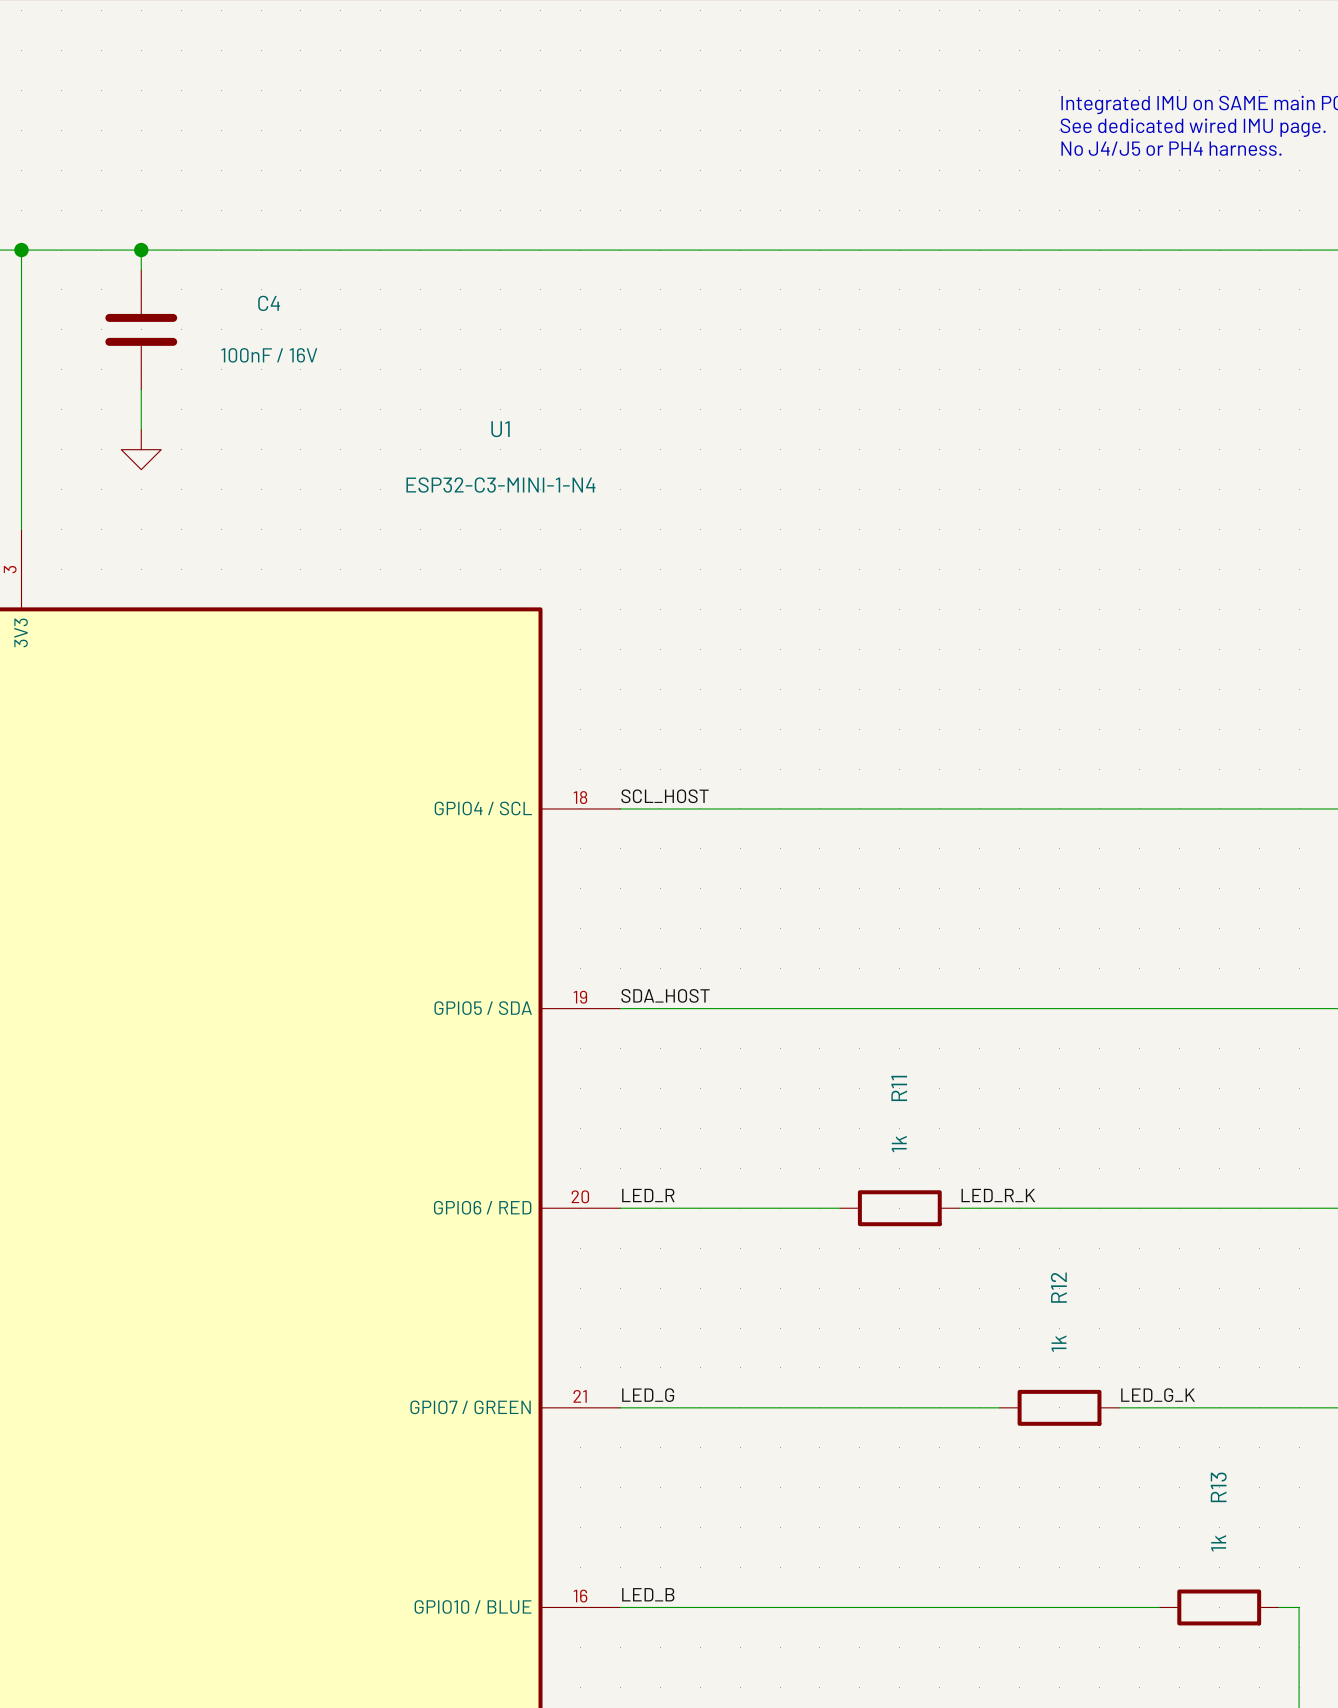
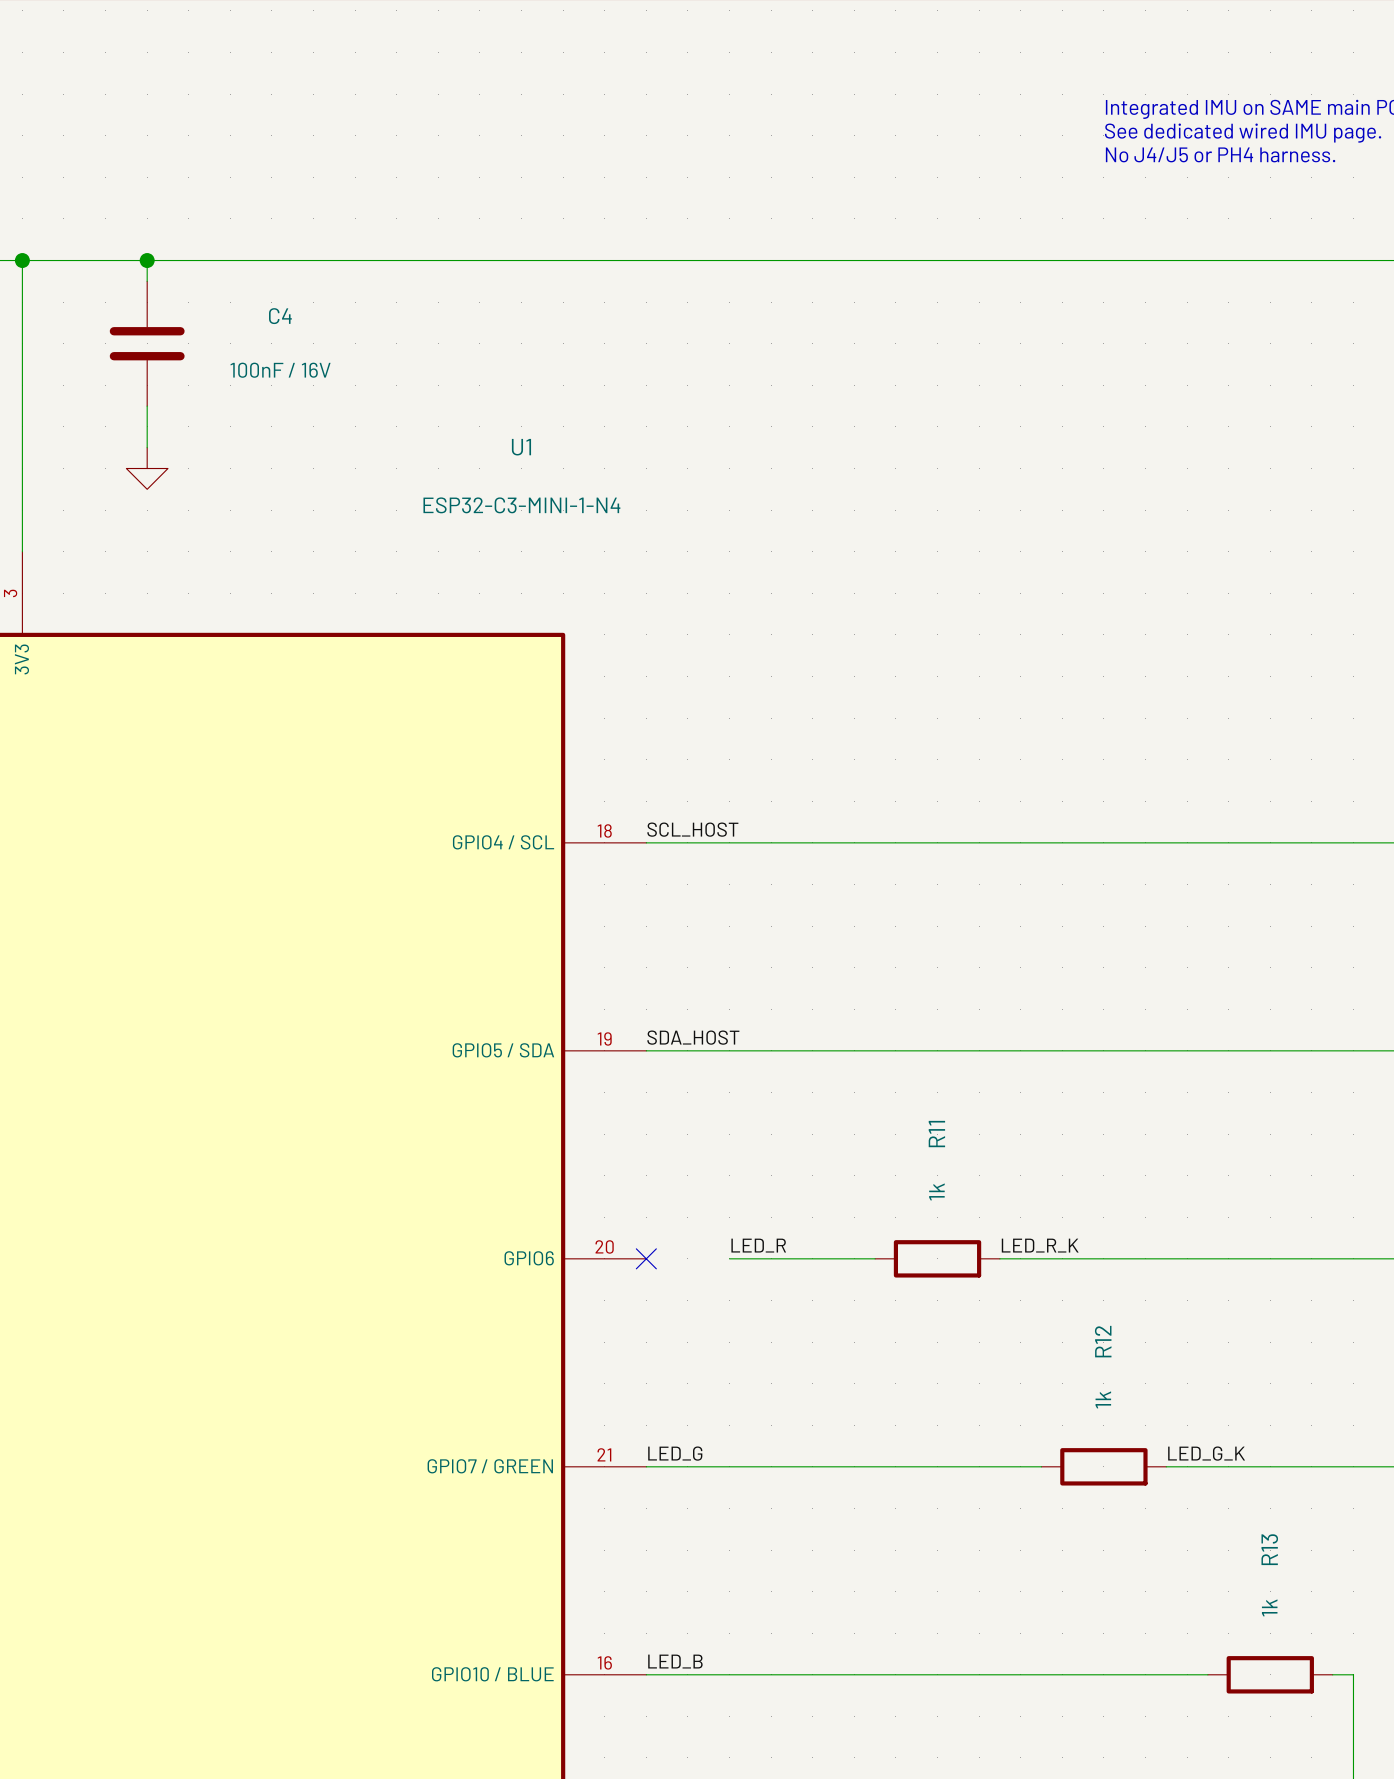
label position: LED_R (648, 1195) -> LED_R (758, 1245)
U1 pin name: GPIO6 / RED (482, 1207) -> GPIO6 (529, 1258)
wire: (620, 1208) (700, 1208) -> none
no-connect mark: none -> (646, 1258)

